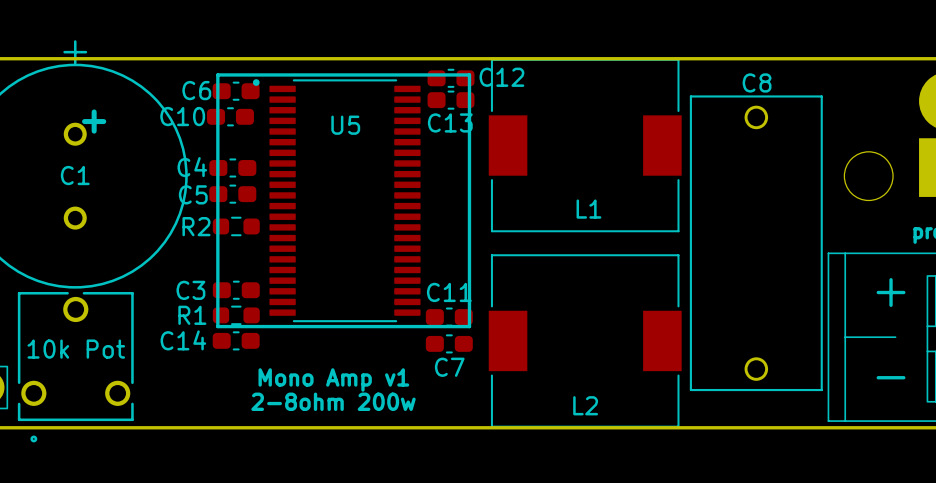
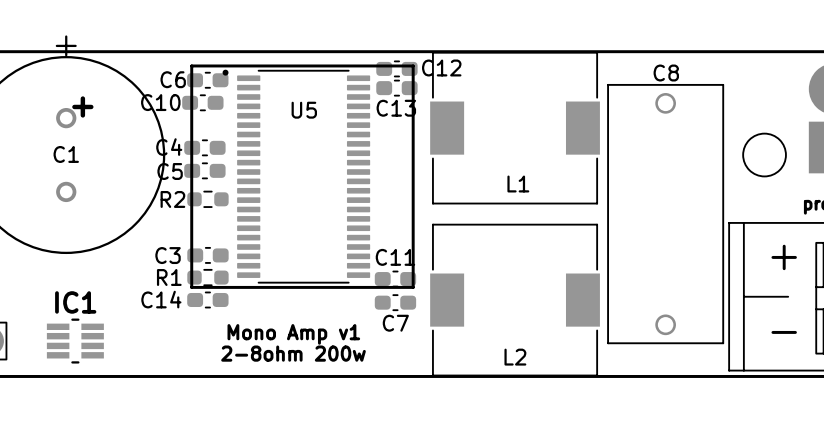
text: 10k Pot (76, 349) -> none
part: (75, 367) -> none
IC1: none -> (75, 341)

